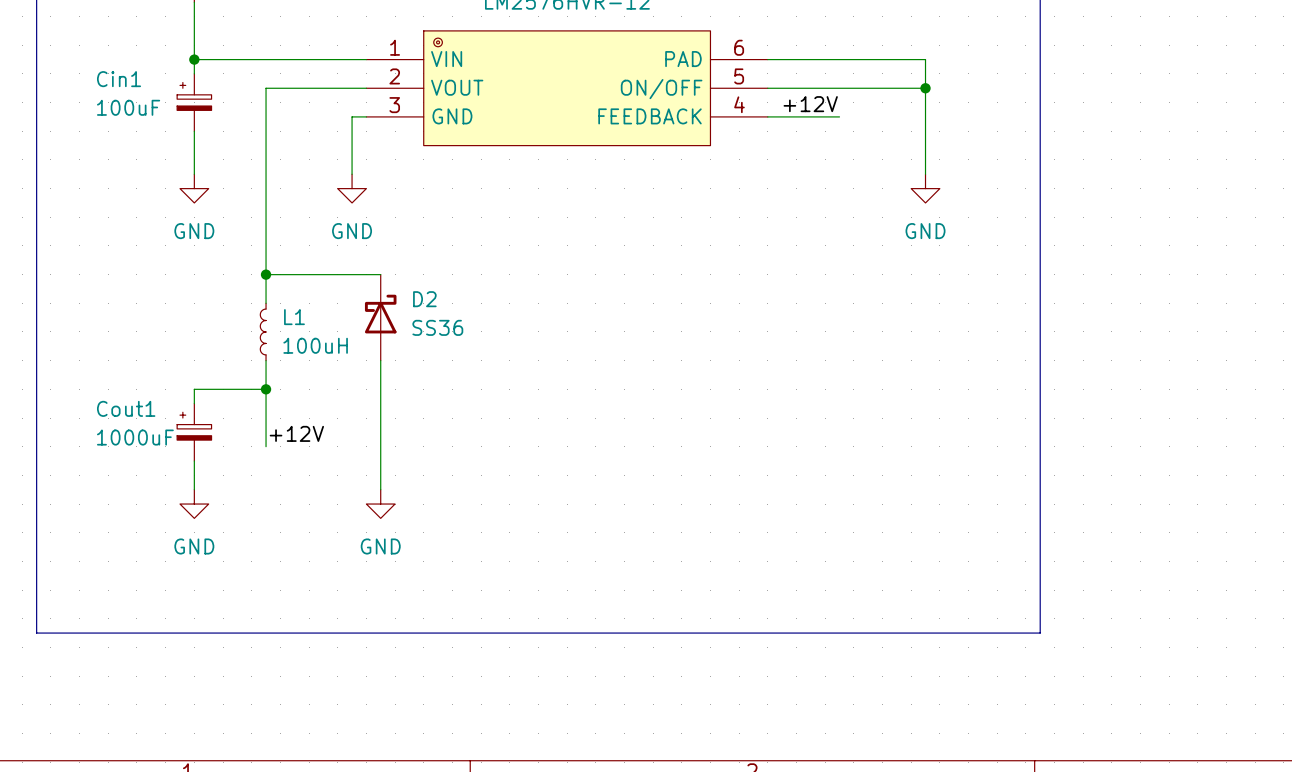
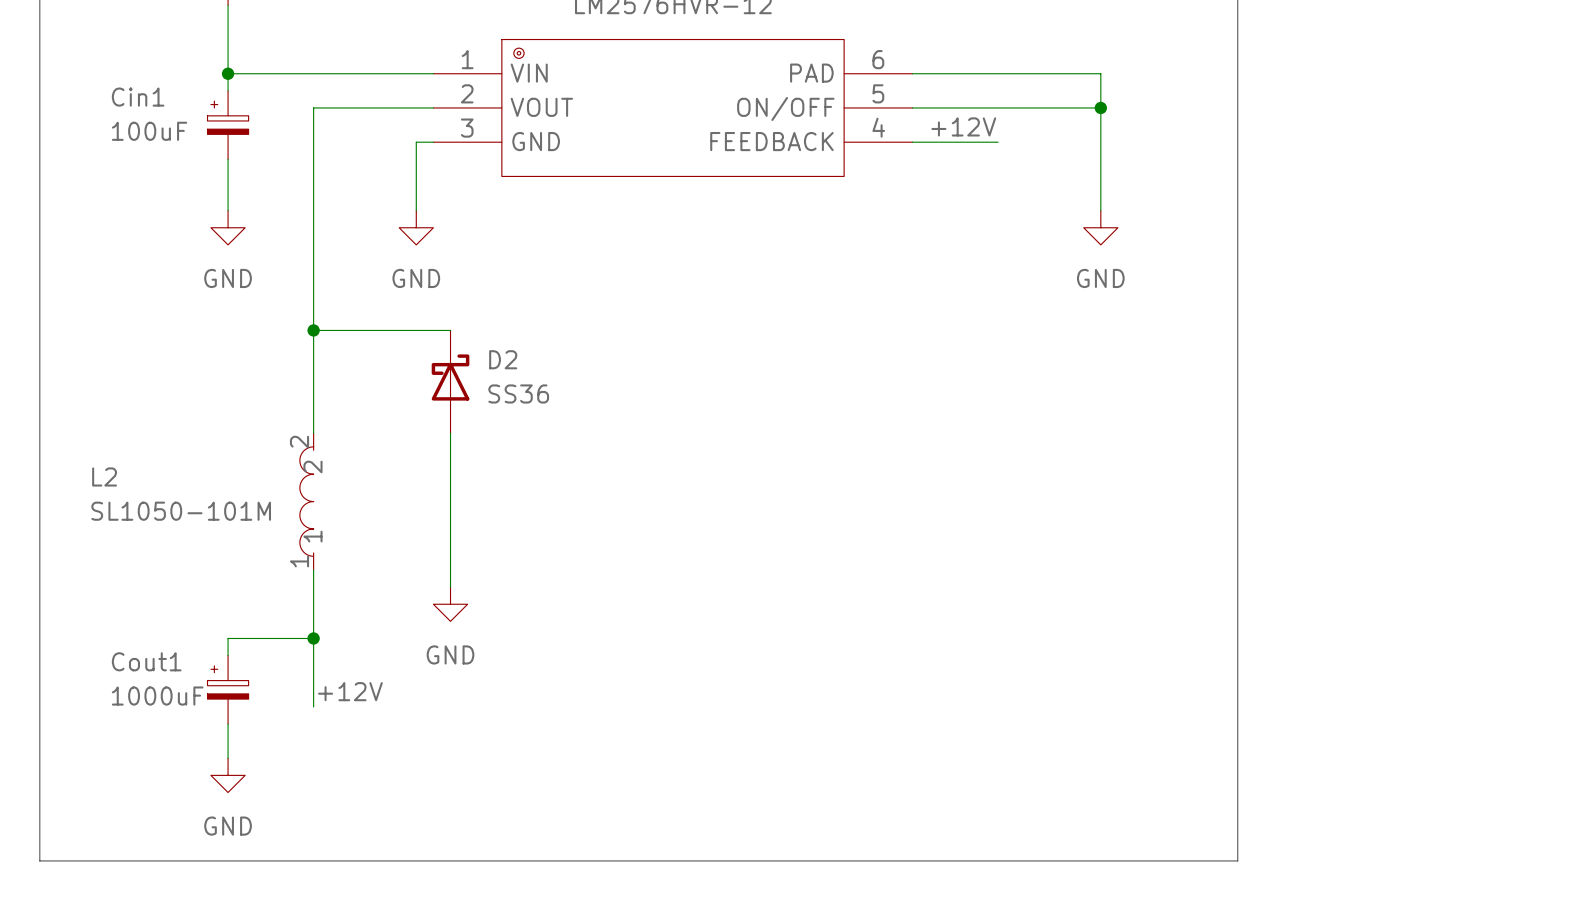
L1: 100uH (263, 331) -> none
wire: (266, 360) (266, 446) -> (313, 433) (313, 364)
wire: (266, 389) (194, 389) (194, 403) -> (313, 638) (228, 638) (228, 655)
junction: (266, 389) -> none
L2: none -> SL1050-101M (306, 501)
Cout1 position: (194, 432) -> (228, 689)
label position: +12V (296, 433) -> +12V (350, 691)
wire: (194, 461) (194, 489) -> (228, 724) (228, 758)
wire: none -> (313, 570) (313, 706)
power symbol position: GND (194, 504) -> GND (228, 775)
junction: none -> (313, 638)
line: (36, 633) (1040, 633) -> (39, 758) (39, 860) (1237, 860) (1237, 758)

